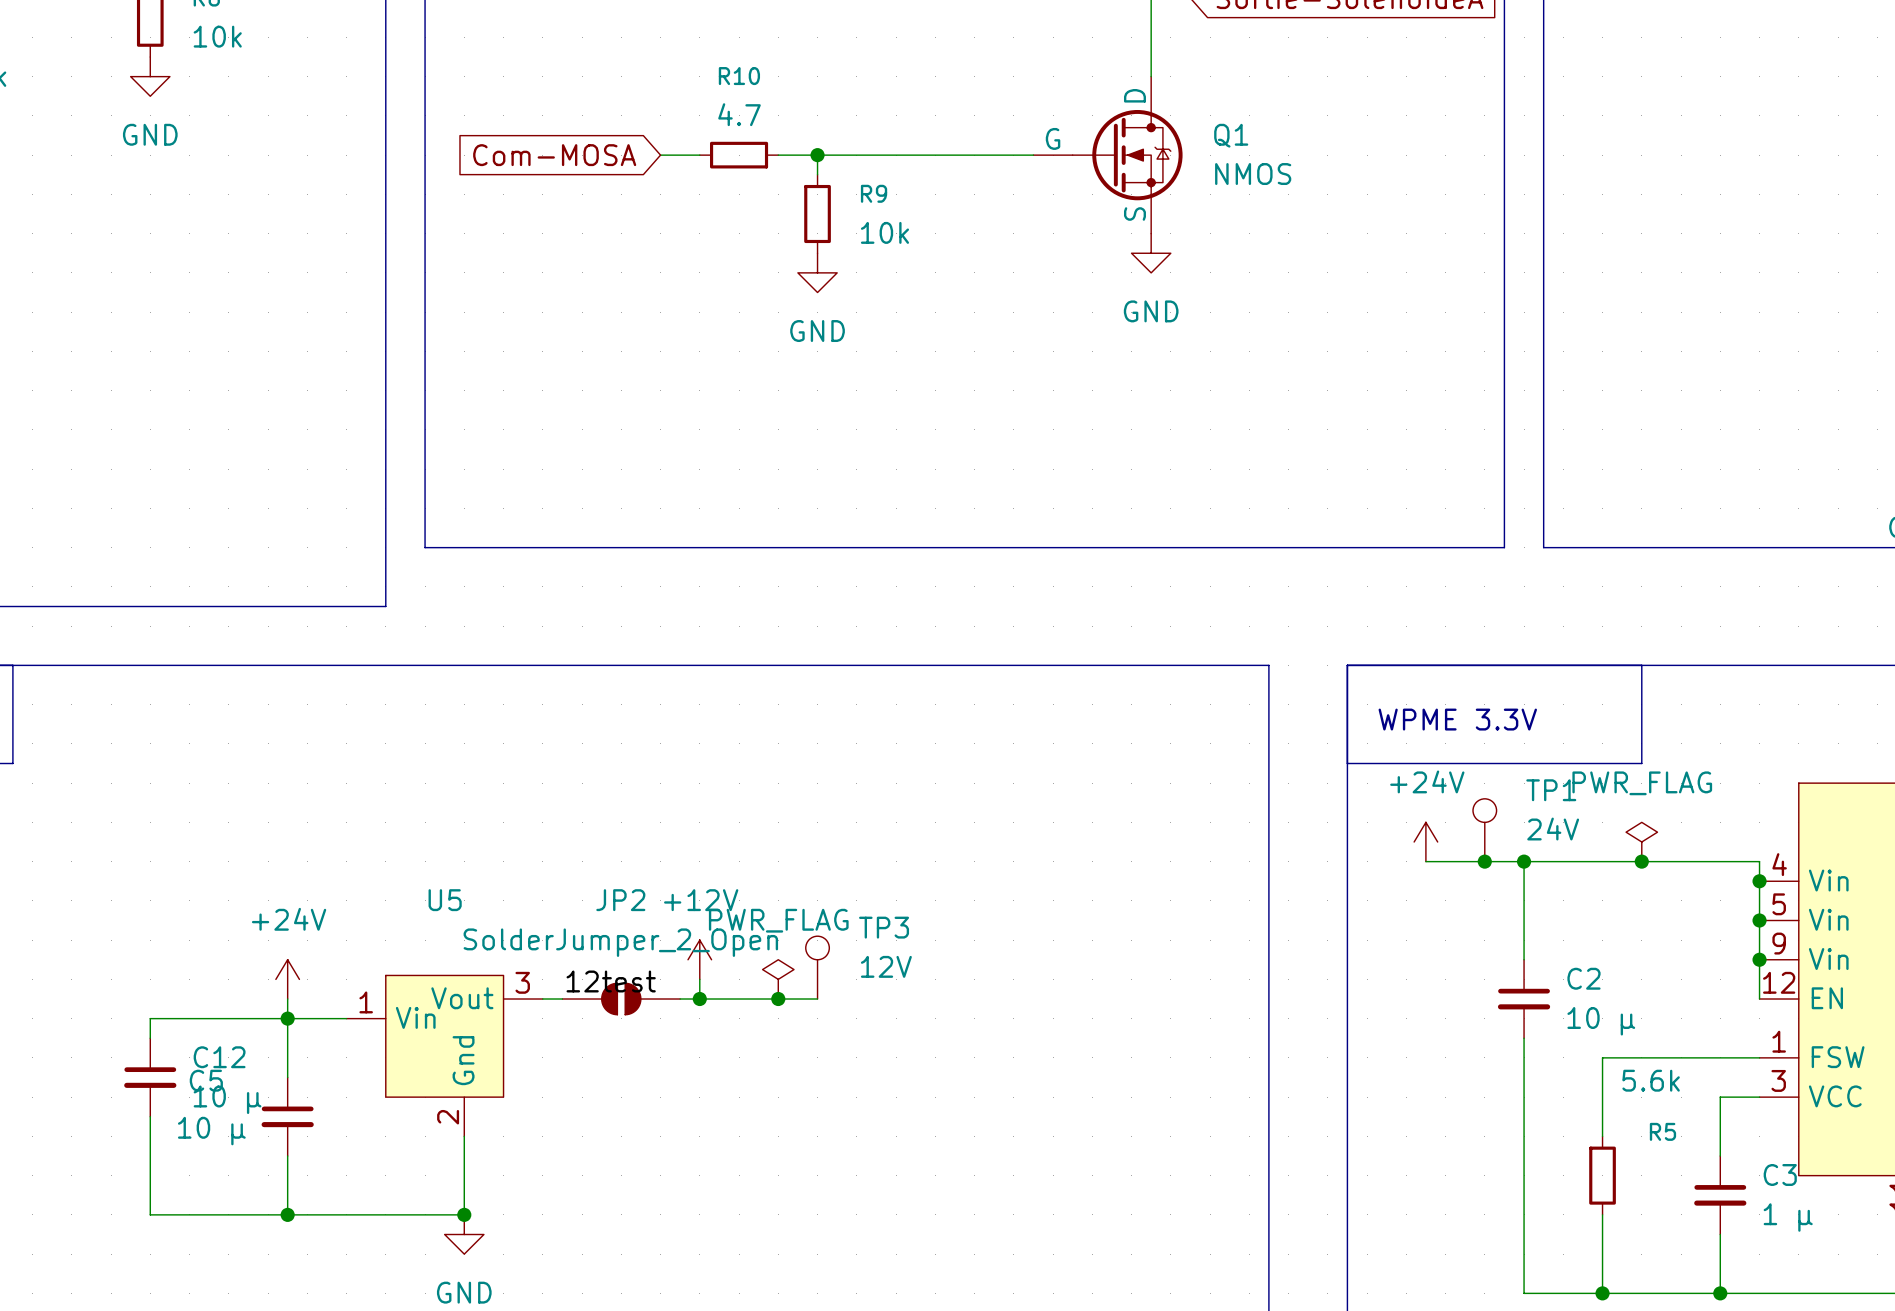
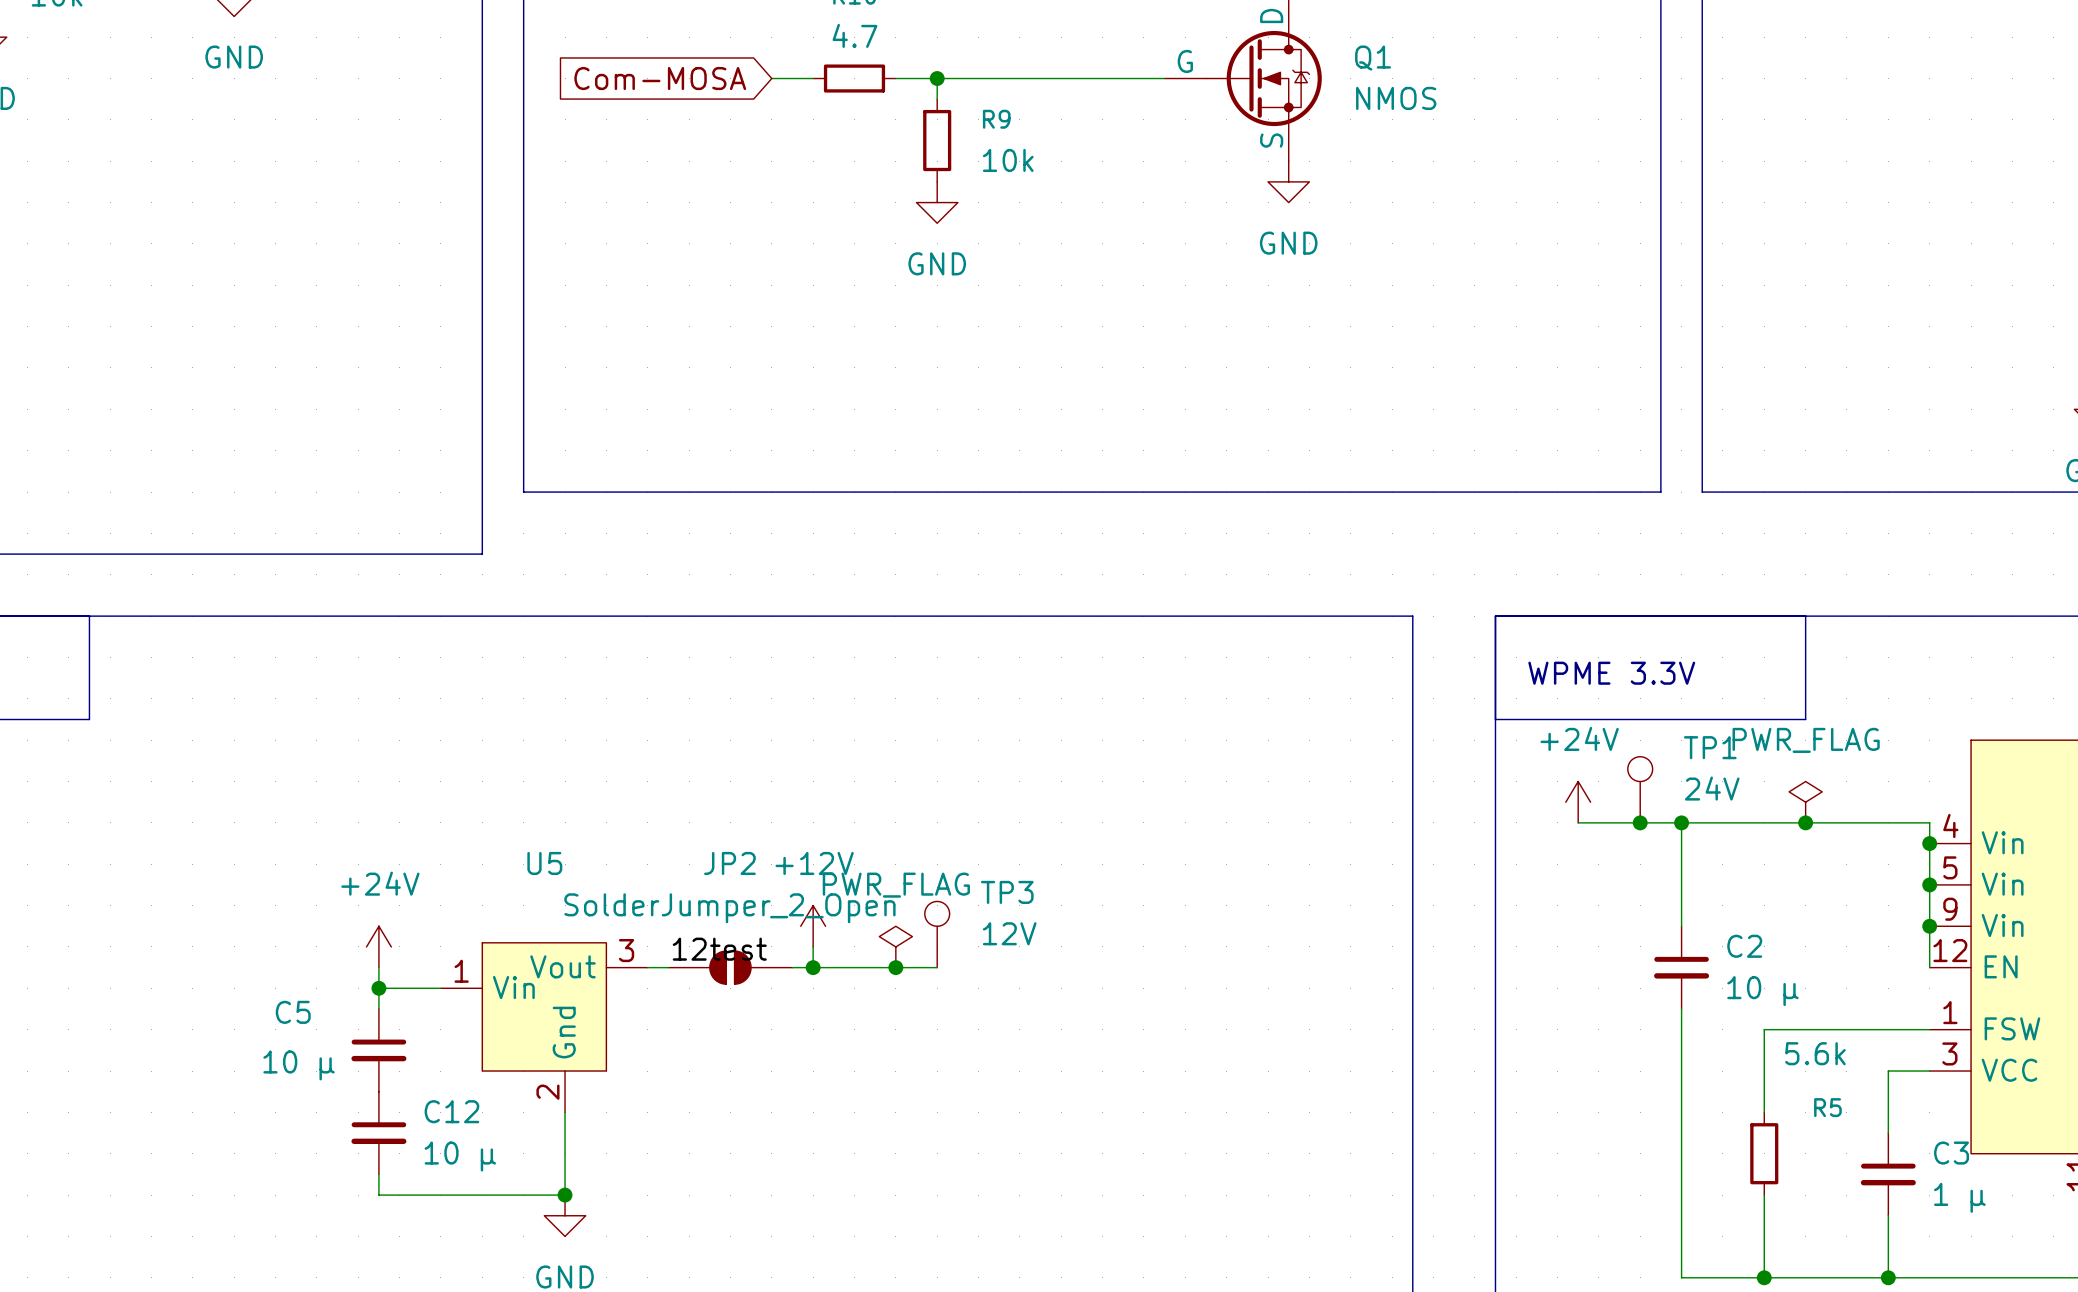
wire: (287, 1018) (150, 1018) (150, 1038) -> none
C12 position: (150, 1077) -> (378, 1133)
wire: (150, 1116) (150, 1214) (287, 1214) -> none
C5 position: (287, 1116) -> (378, 1050)
junction: (287, 1214) -> none

